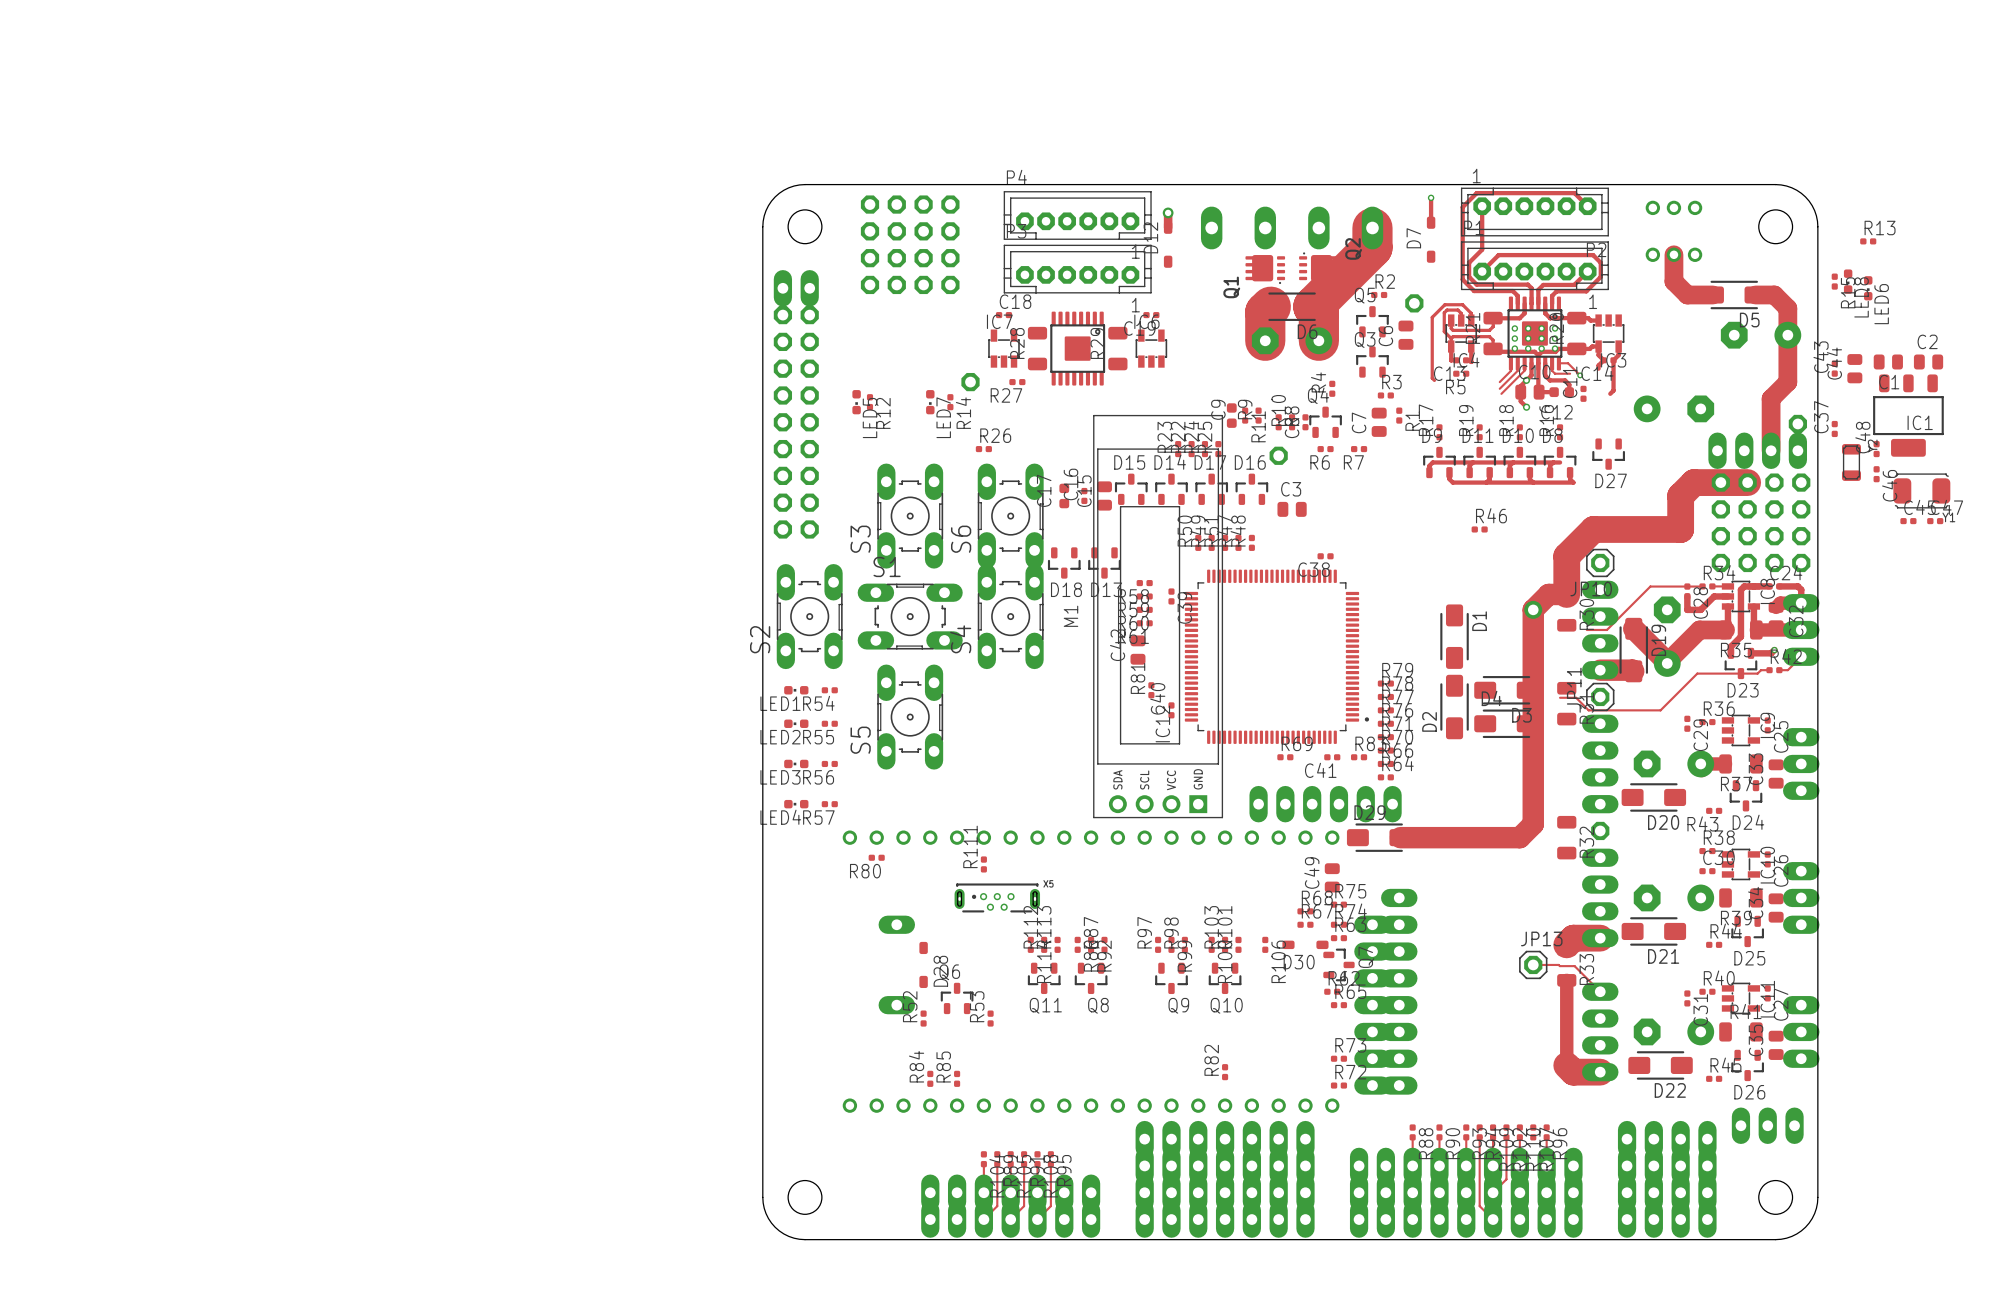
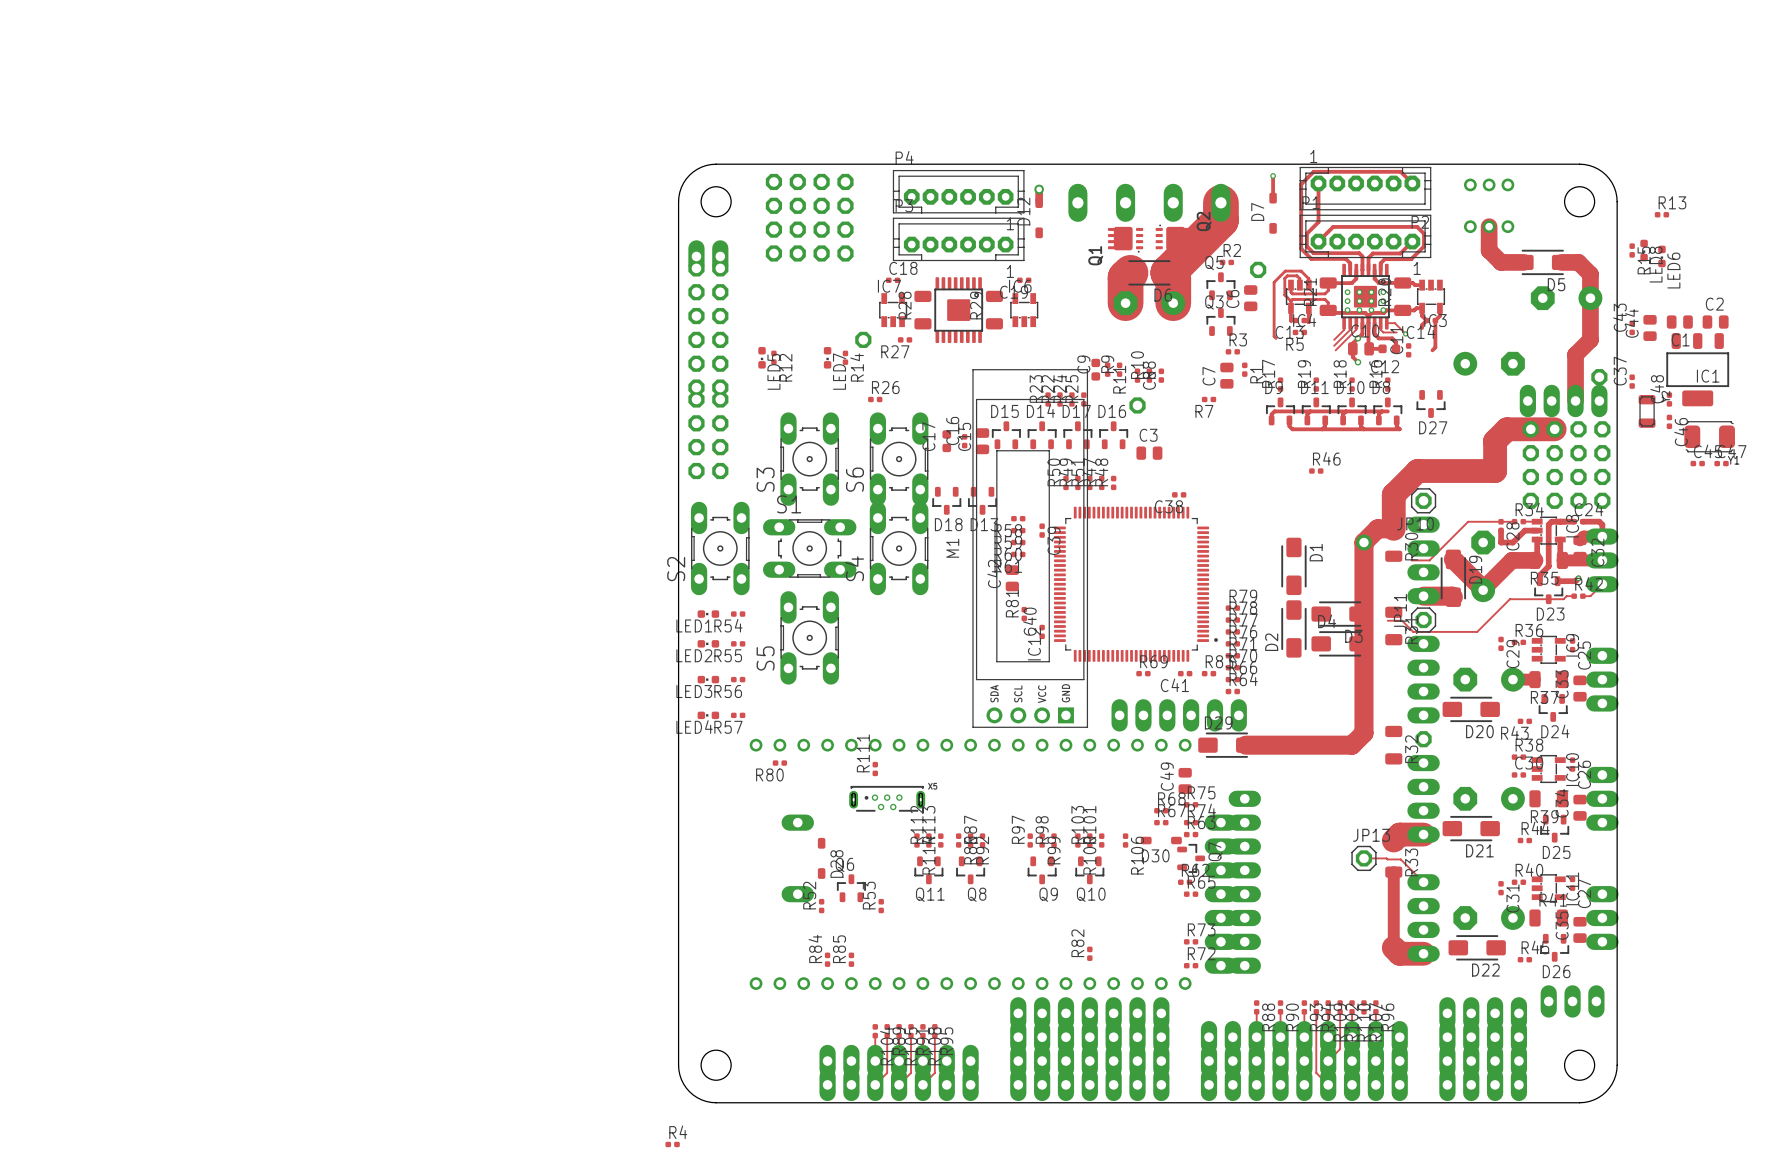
part footprint: [773, 305, 819, 432] -> [688, 260, 729, 396]
R4 rotation: 0° (1332, 388) -> 90° clockwise (672, 1144)
R4 position: (1332, 388) -> (672, 1144)
Q4: (1325, 422) -> none
R6: (1325, 449) -> none

